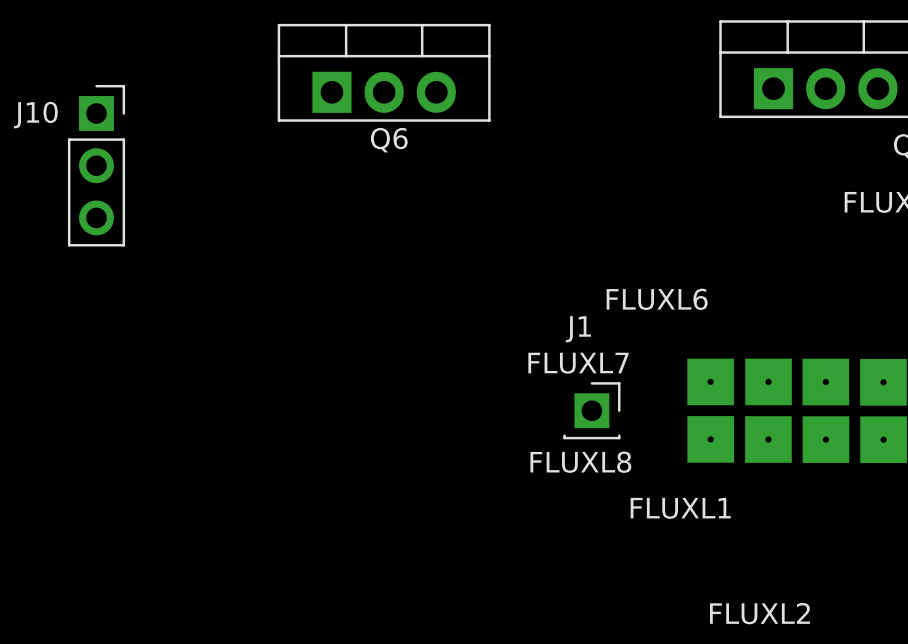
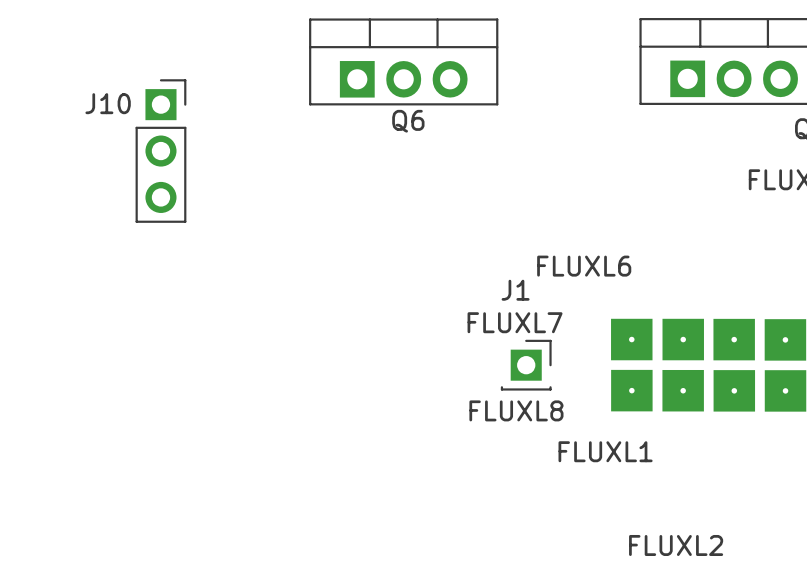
Q6 position: (384, 72) -> (403, 61)
J10 position: (96, 165) -> (160, 151)

